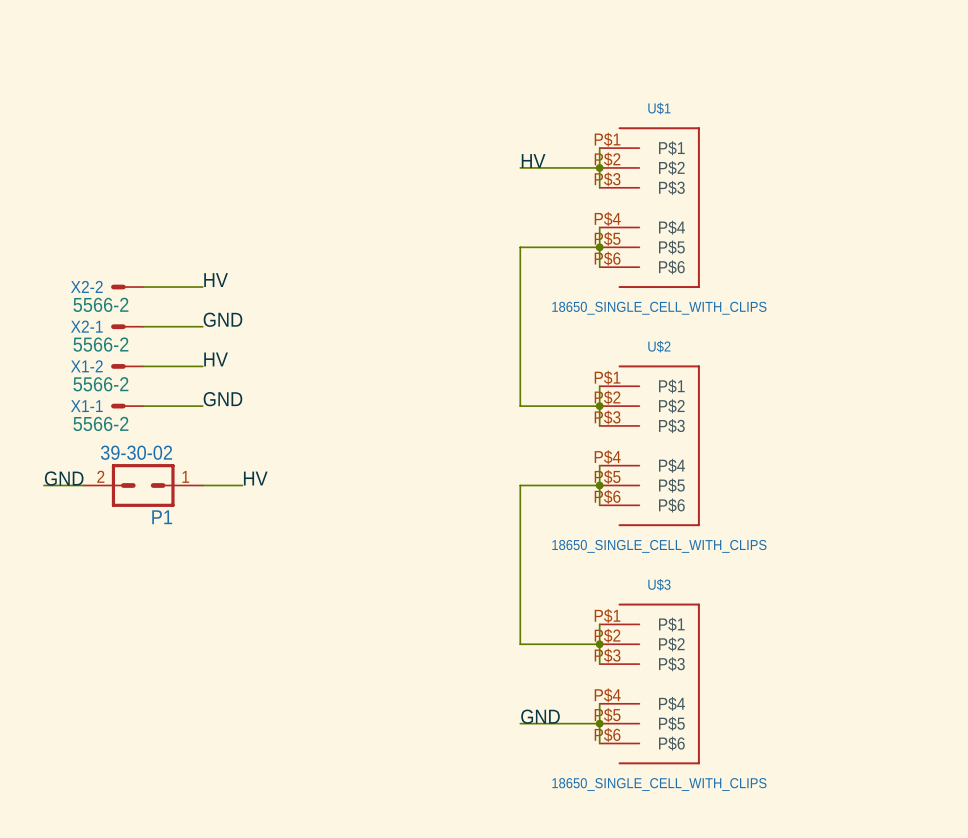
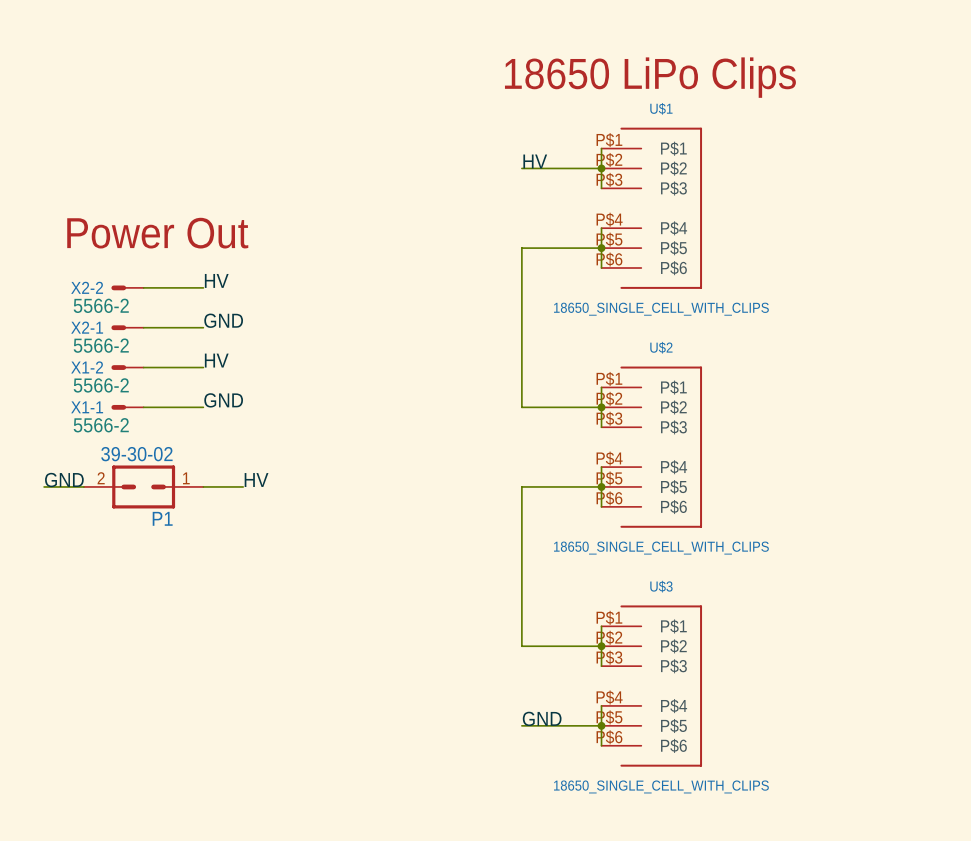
text: none -> 18650 LiPo Clips (650, 77)
text: none -> Power Out (157, 233)

